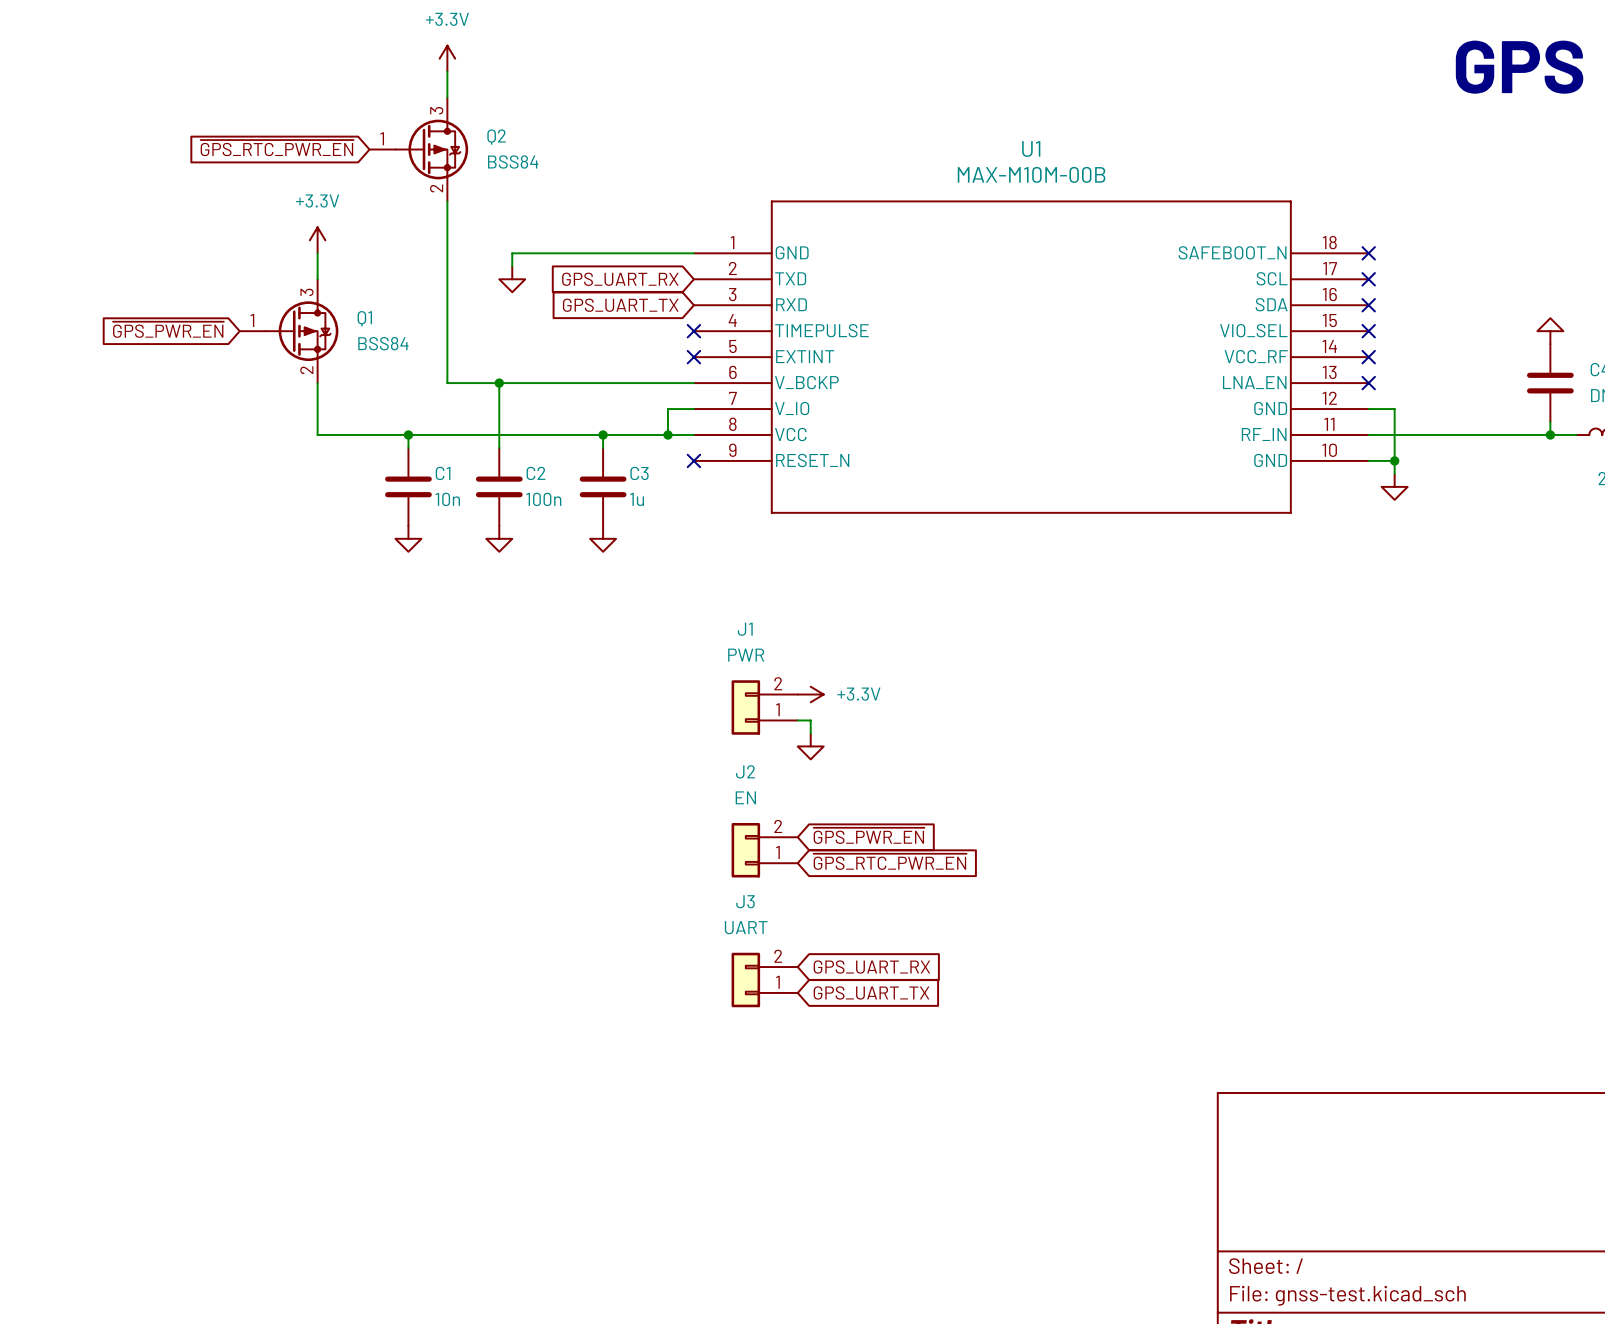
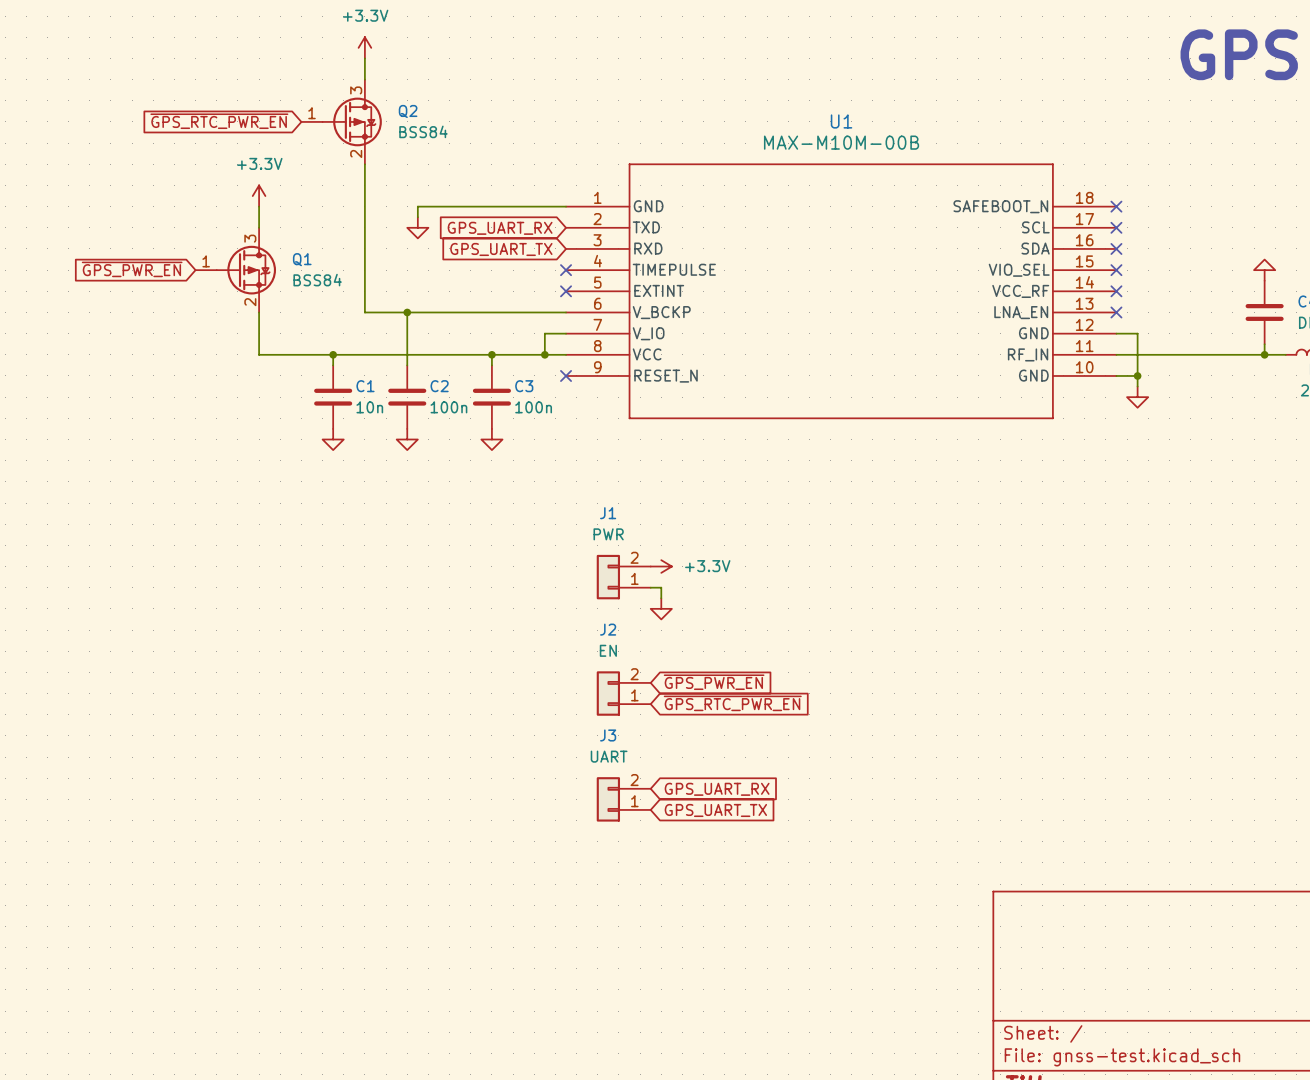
C3 value: 1u (637, 499) -> 100n (533, 407)

